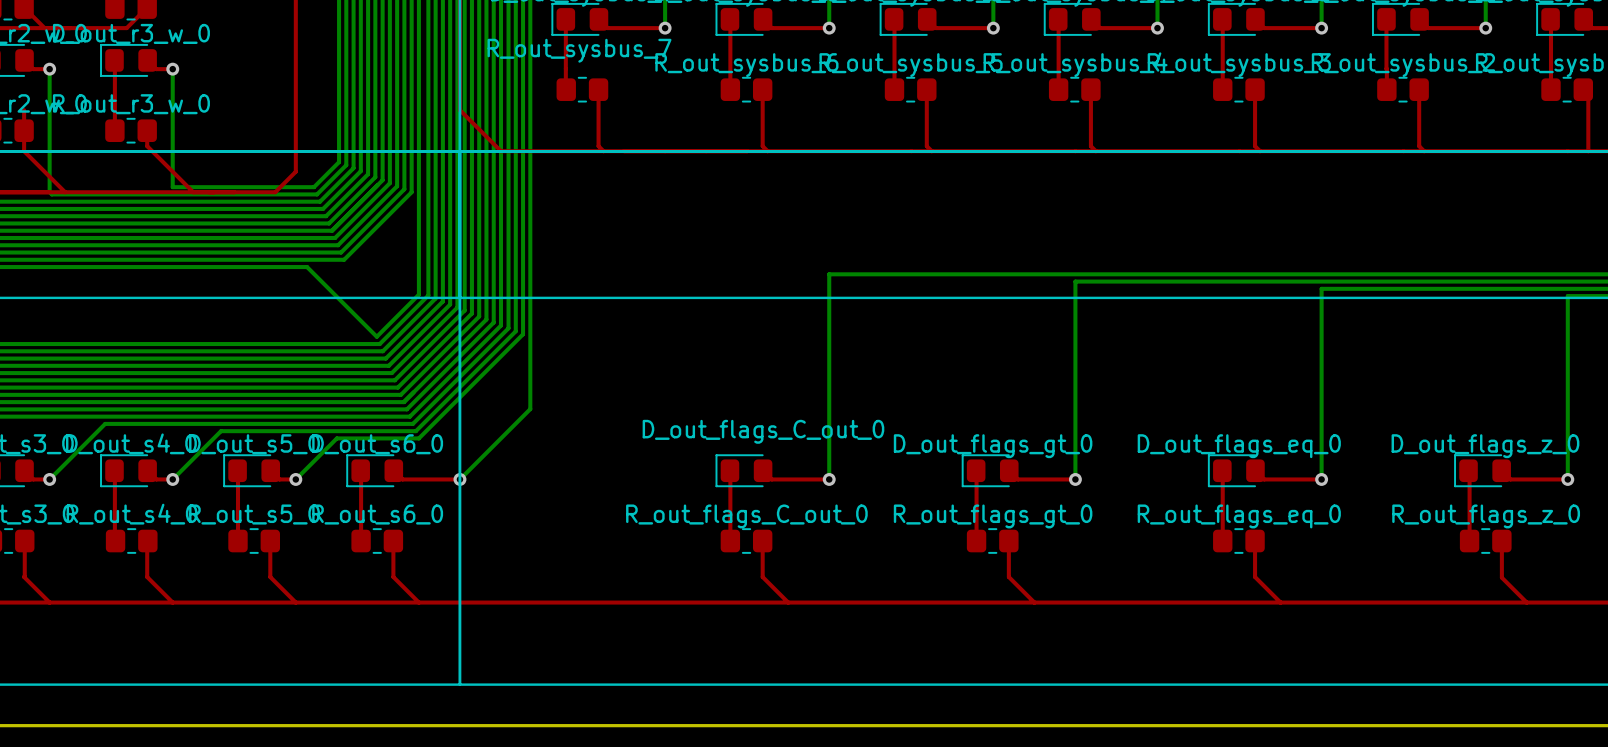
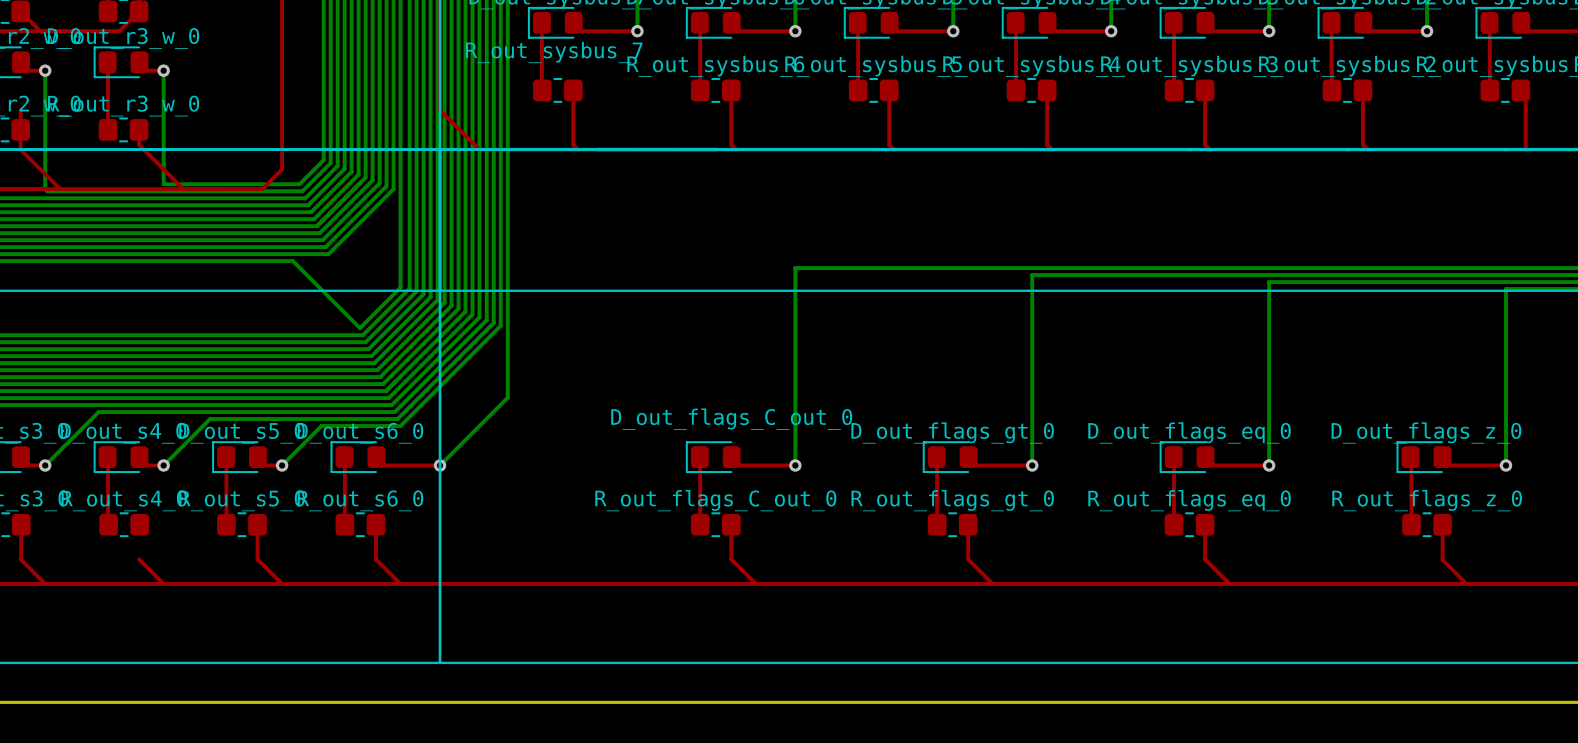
top track: (147, 541) (147, 577) -> none

